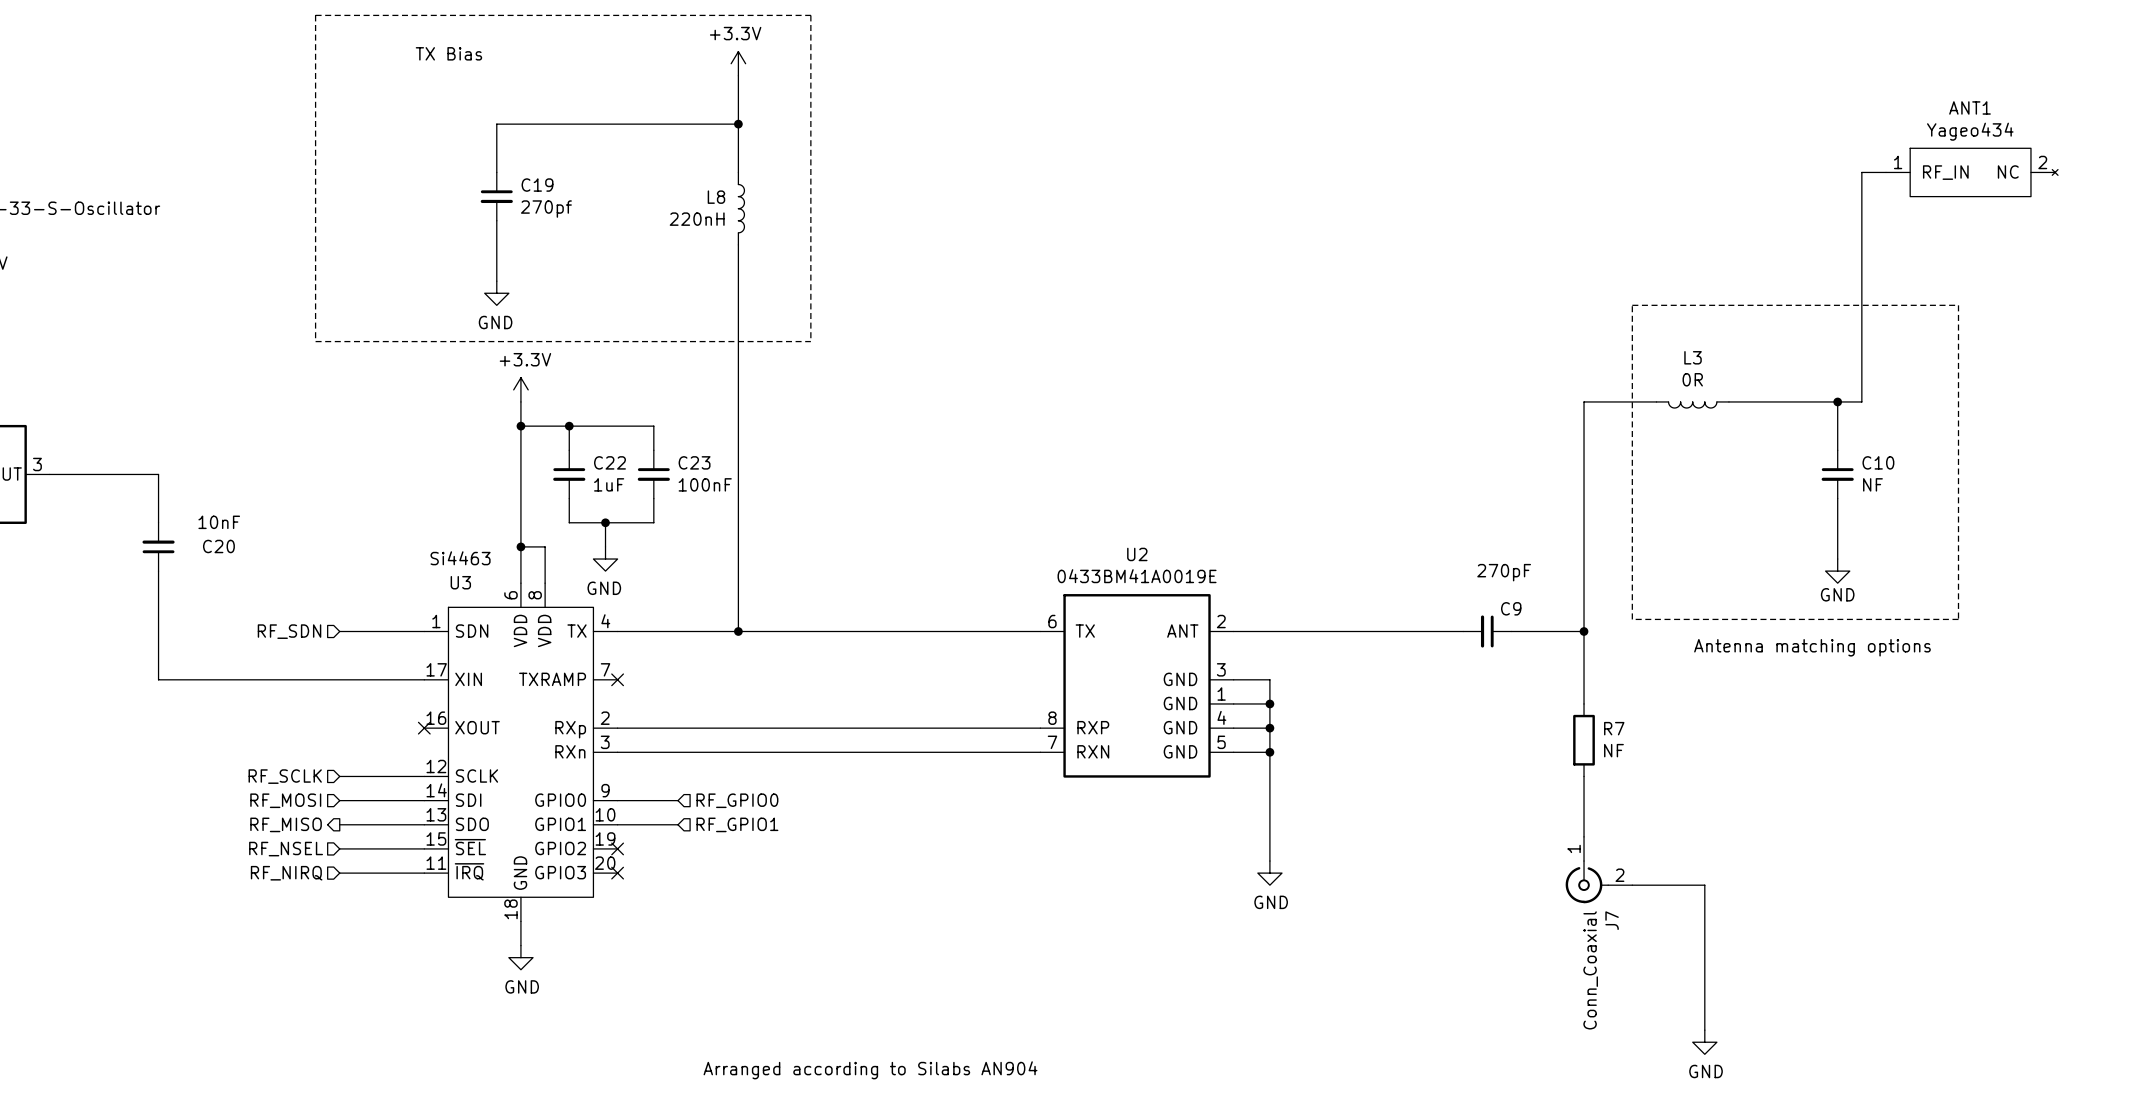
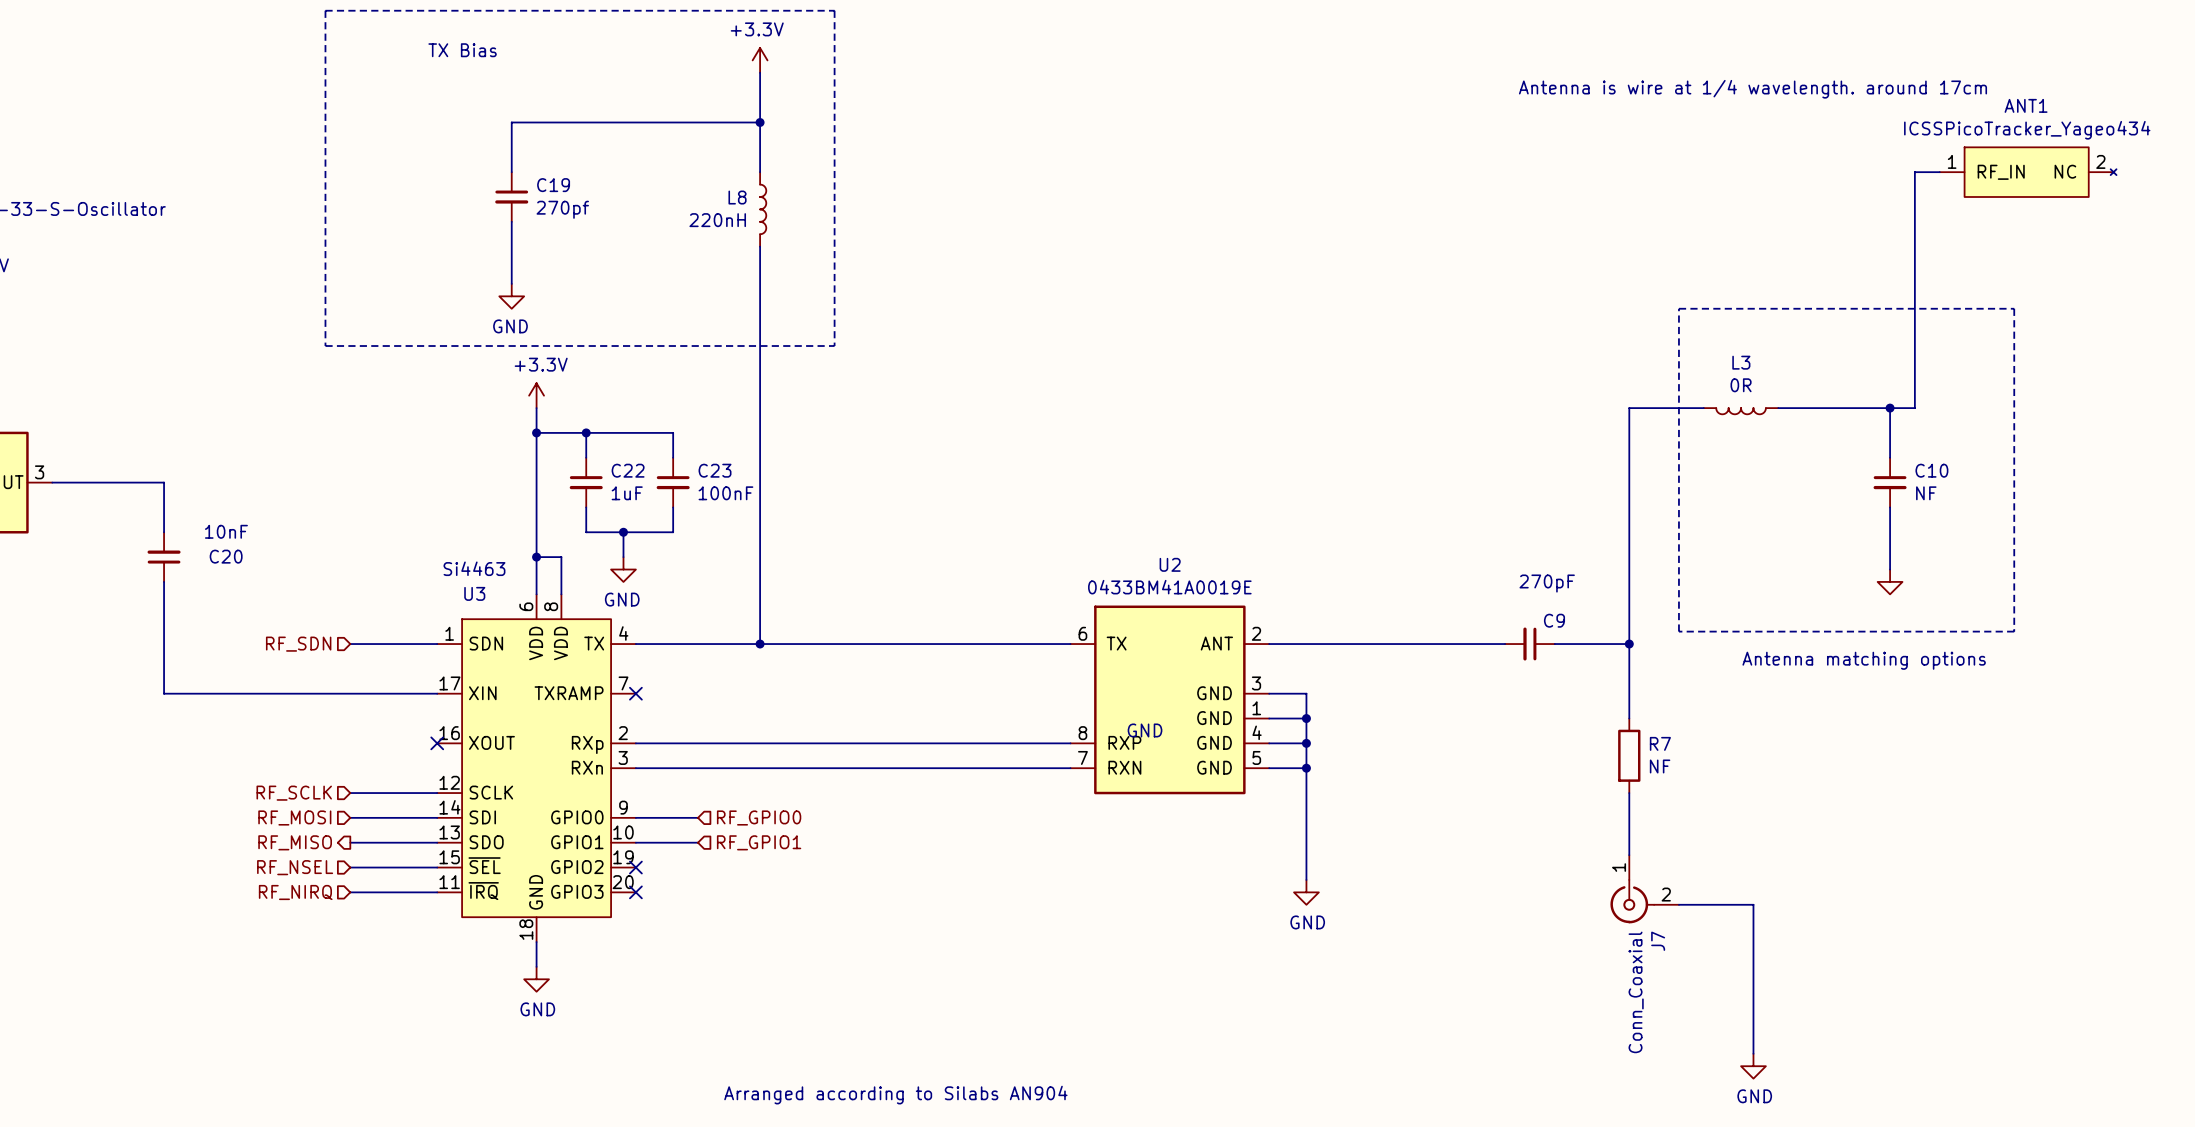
text: none -> Antenna is wire at 1/4 wavelength. around 17cm (1752, 89)
ANT1 value: Yageo434 (1970, 131) -> ICSSPicoTracker_Yageo434 (2027, 130)
power symbol text position: GND (1837, 594) -> GND (1145, 730)

